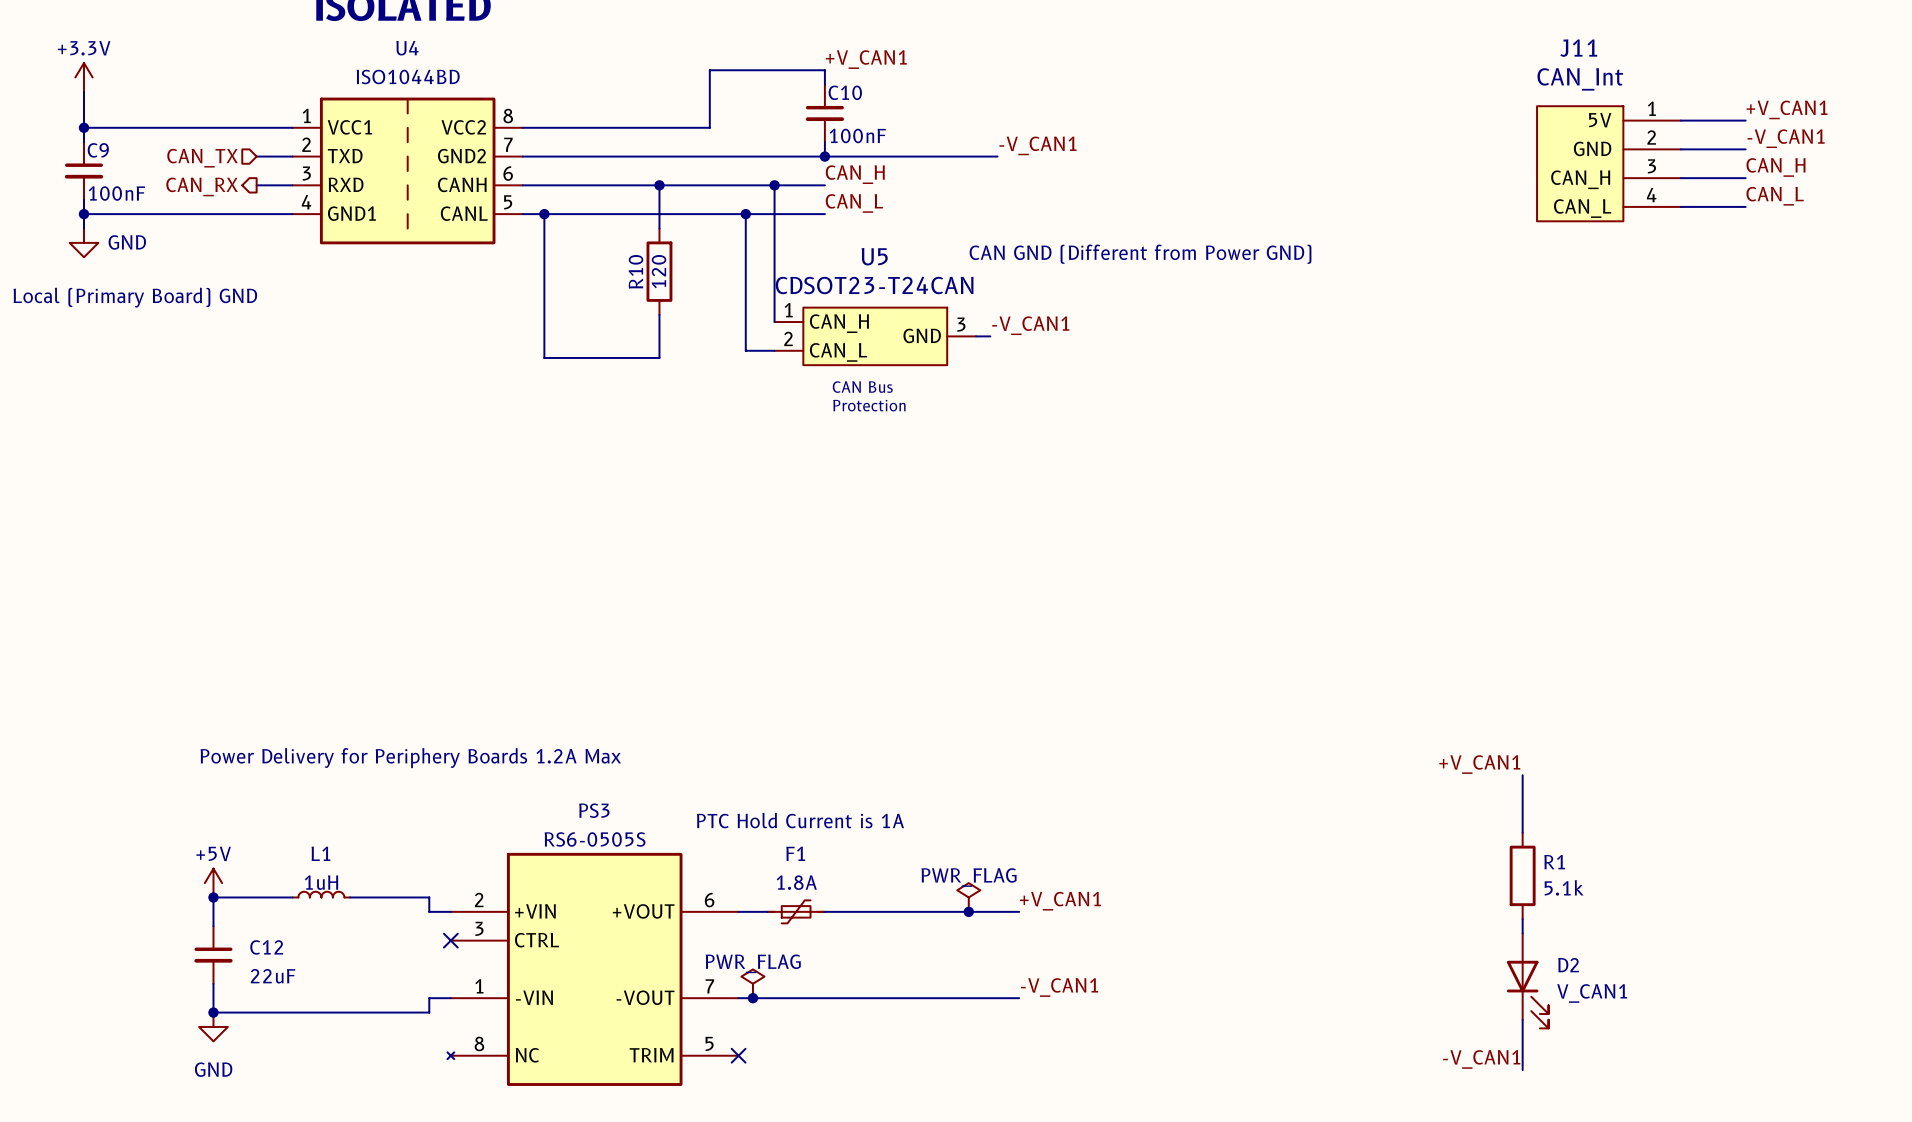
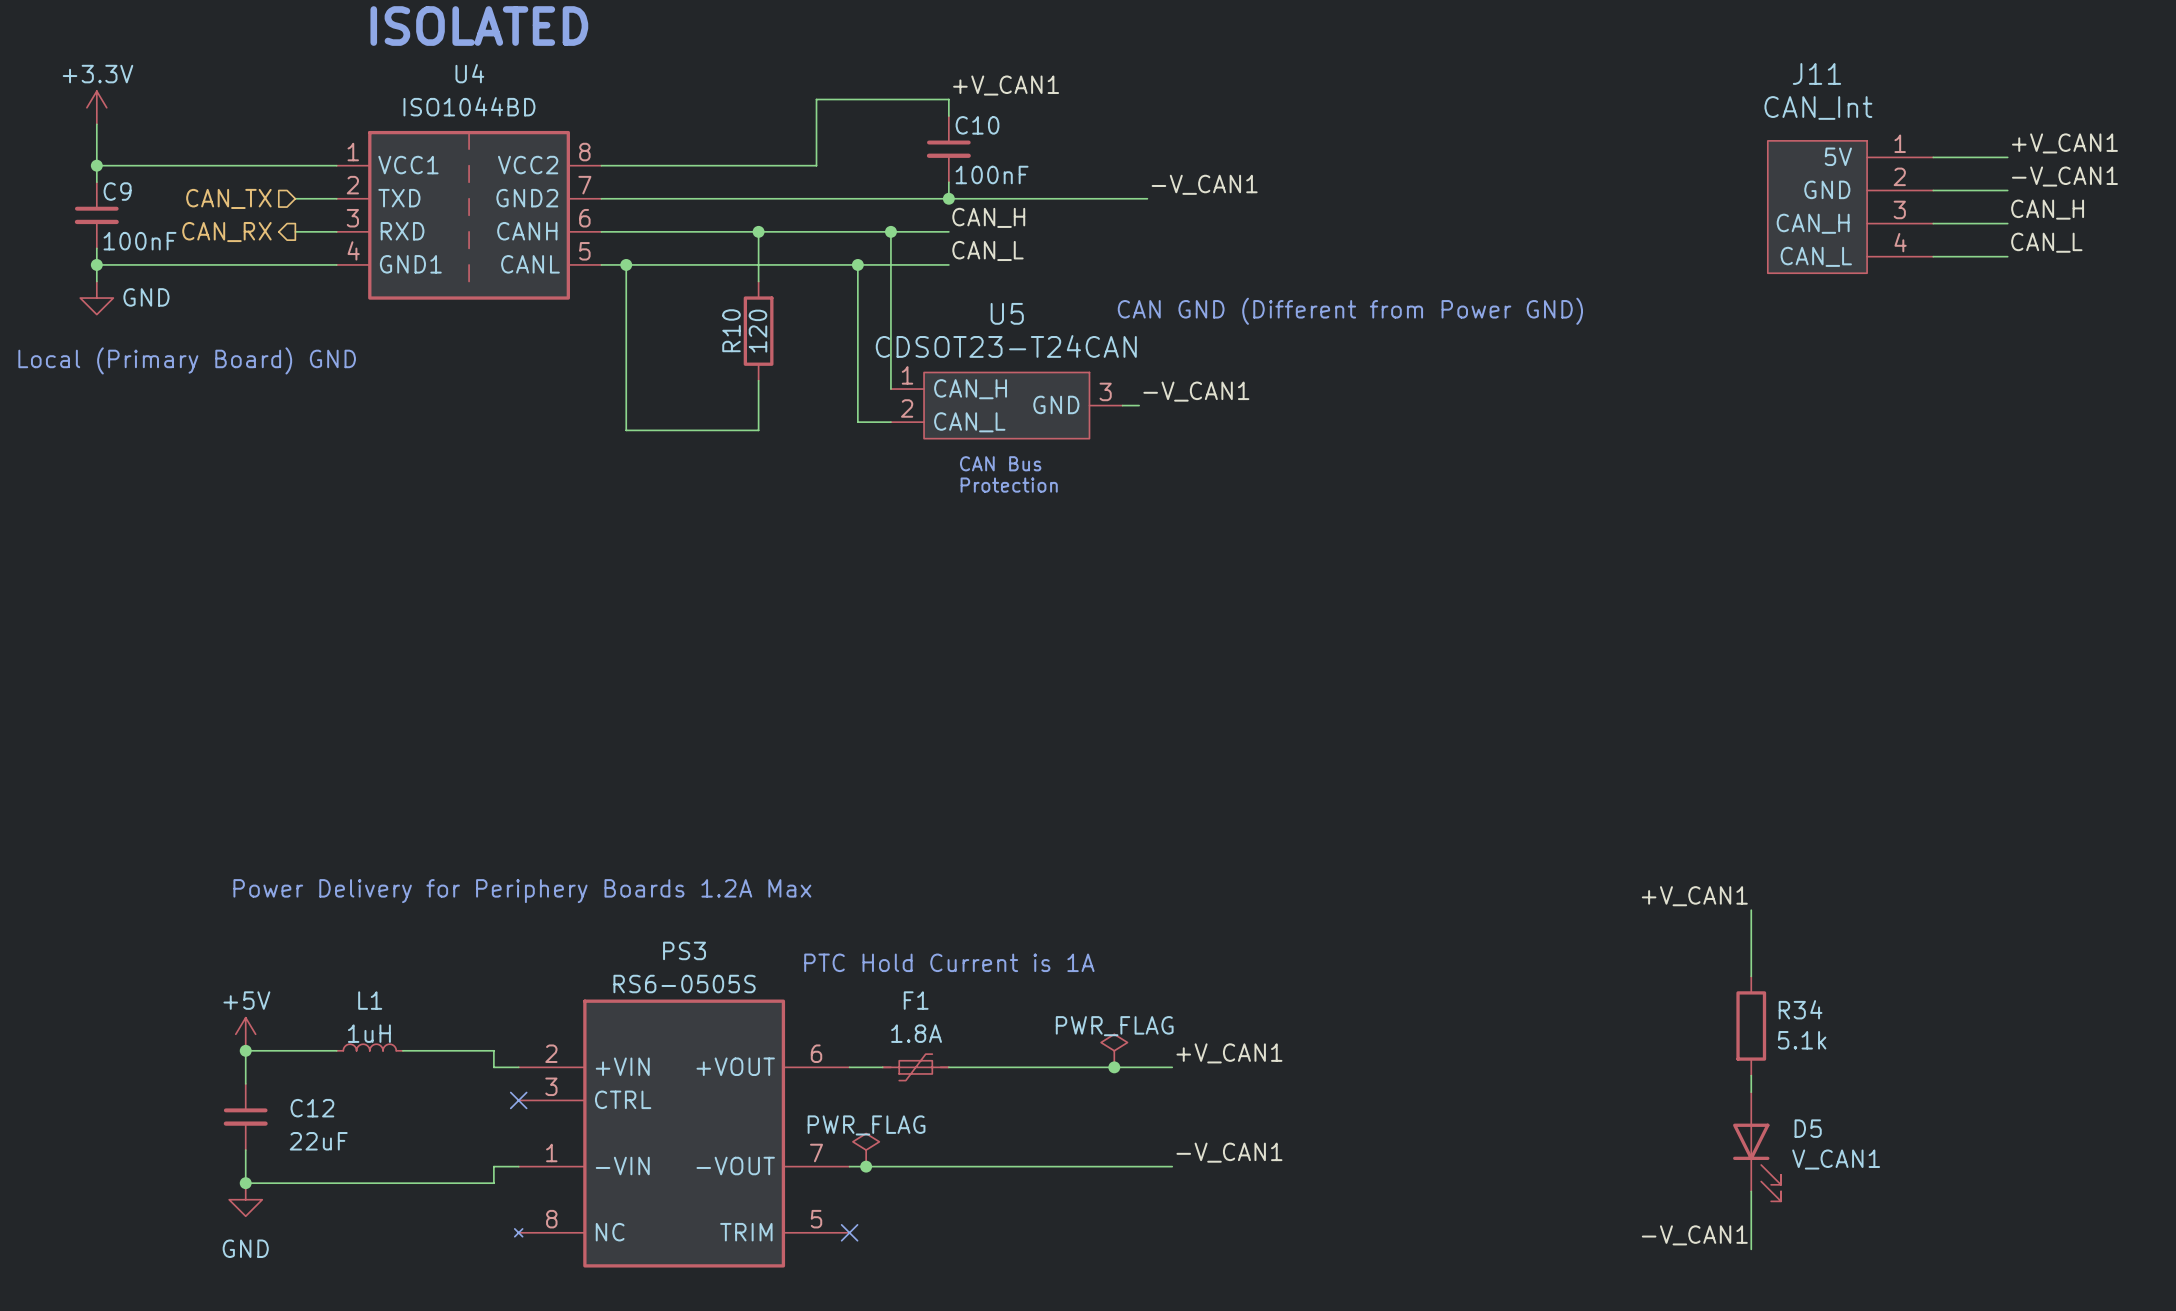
R1 name: R1 (1554, 862) -> R34 (1800, 1009)
D2 name: D2 (1568, 965) -> D5 (1808, 1128)

